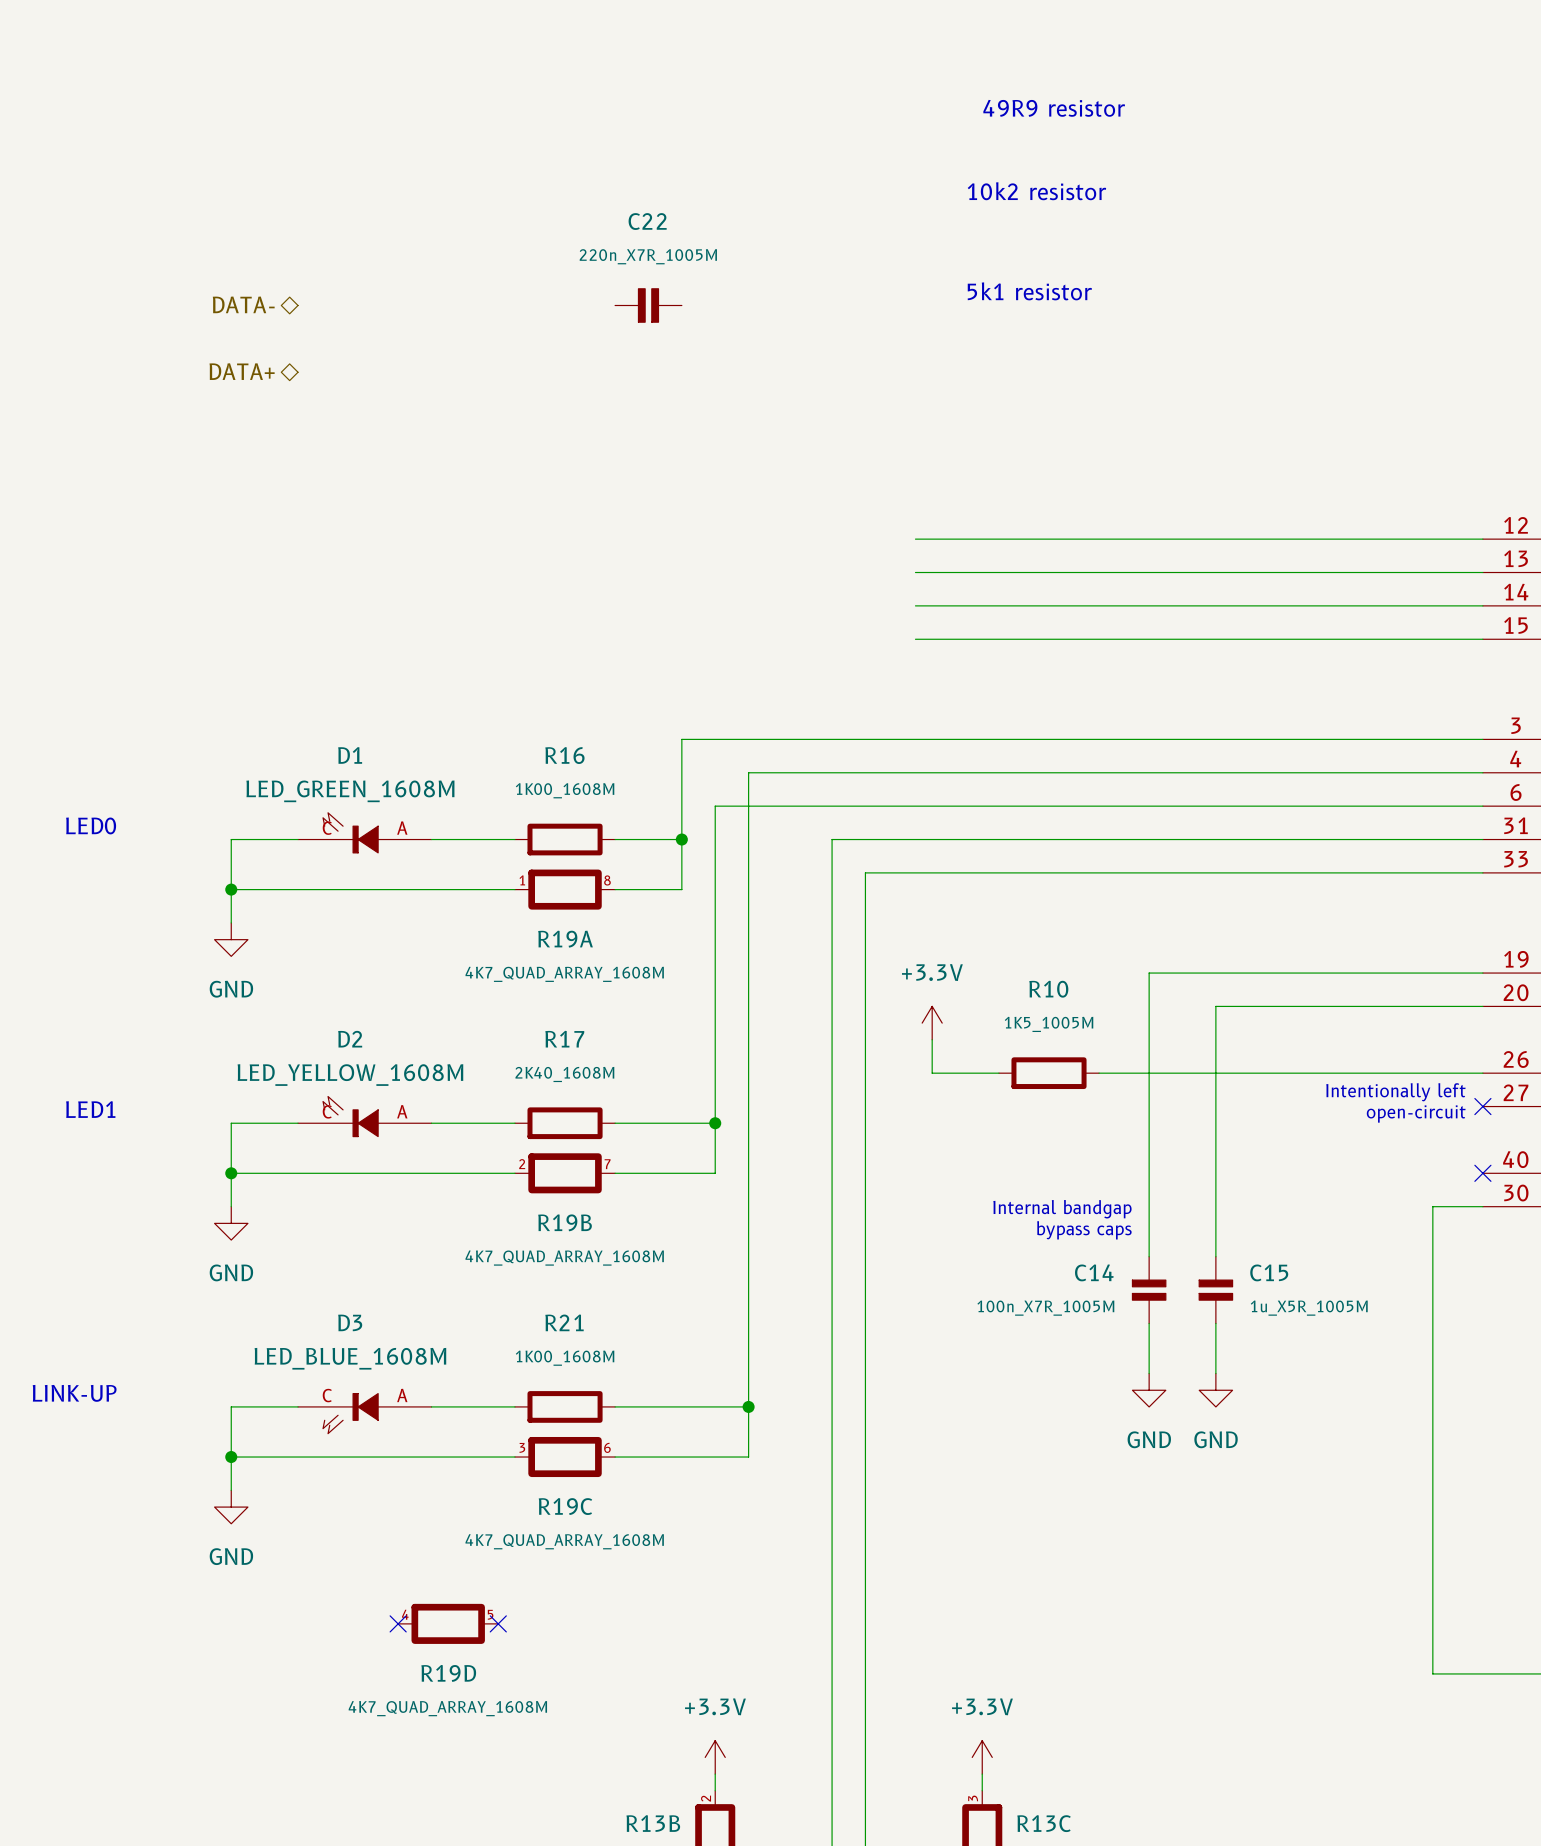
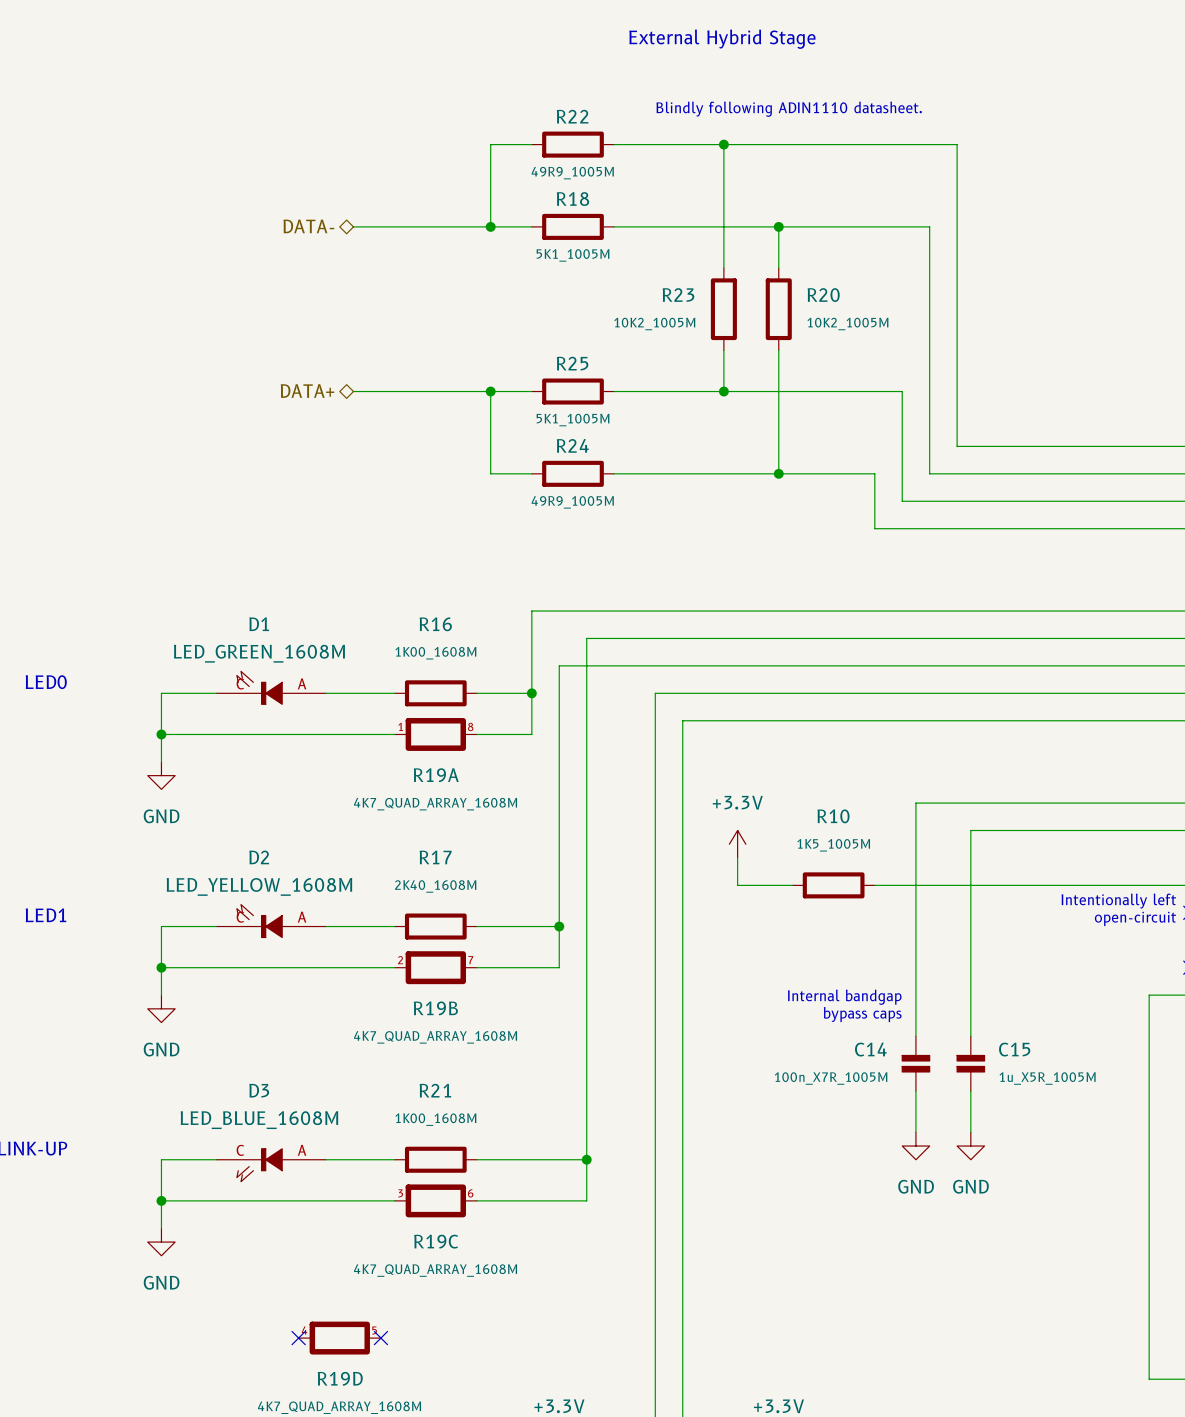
text: none -> External Hybrid Stage (722, 39)
text: 49R9 resistor (1054, 108) -> none
text: none -> Blindly following ADIN1110 datasheet. (789, 109)
wire: none -> (531, 144) (490, 144) (490, 226)
R22: none -> 49R9_1005M (573, 144)
wire: none -> (723, 144) (723, 268)
junction: none -> (723, 144)
text: 10k2 resistor (1036, 191) -> none
wire: none -> (353, 226) (531, 226)
junction: none -> (490, 226)
R18: none -> 5K1_1005M (573, 226)
wire: none -> (614, 226) (929, 226) (929, 473)
wire: none -> (778, 226) (778, 268)
junction: none -> (778, 226)
text: 5k1 resistor (1029, 291) -> none
hierarchical label position: DATA- (243, 304) -> DATA- (308, 226)
C22: 220n_X7R_1005M (648, 305) -> none
hierarchical label position: DATA+ (242, 371) -> DATA+ (307, 391)
R23: none -> 10K2_1005M (723, 309)
R20: none -> 10K2_1005M (778, 309)
wire: none -> (723, 350) (723, 391)
wire: none -> (778, 350) (778, 473)
wire: none -> (353, 391) (531, 391)
wire: none -> (490, 391) (490, 473) (531, 473)
junction: none -> (490, 391)
R25: none -> 5K1_1005M (573, 391)
junction: none -> (723, 391)
wire: (915, 539) (1199, 539) -> (614, 144) (957, 144) (957, 446)
R24: none -> 49R9_1005M (573, 473)
wire: none -> (614, 473) (723, 473)
junction: none -> (778, 473)
wire: (1099, 572) (1165, 572) -> (874, 473) (874, 528)
wire: (915, 605) (1132, 605) -> (614, 391) (902, 391) (902, 501)
wire: (915, 639) (1099, 639) -> none

